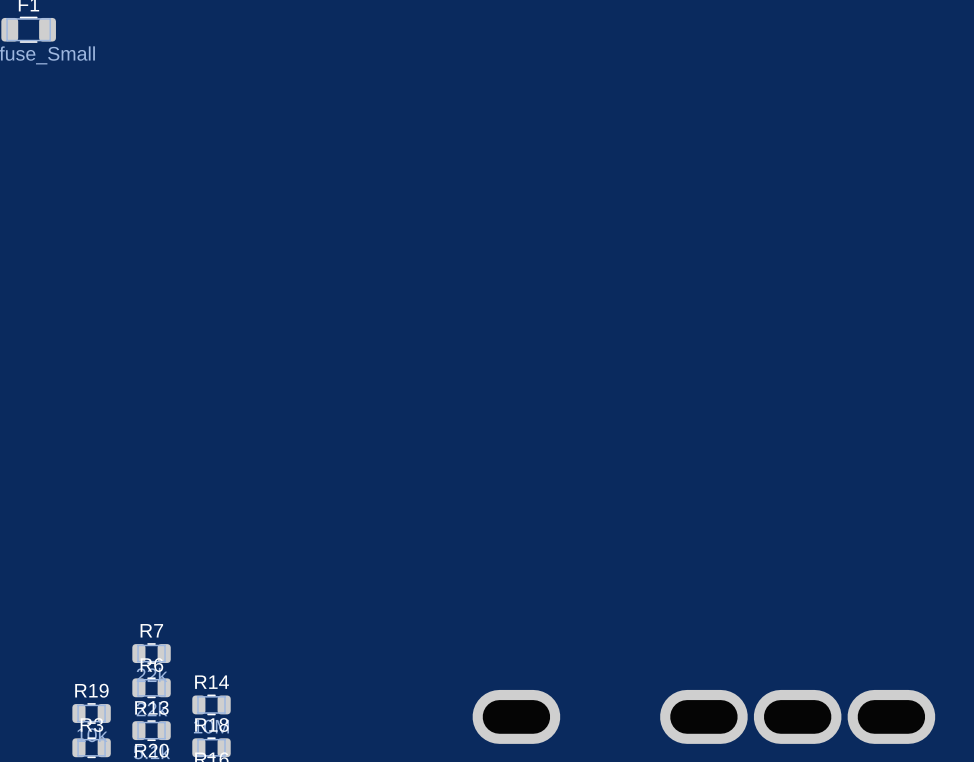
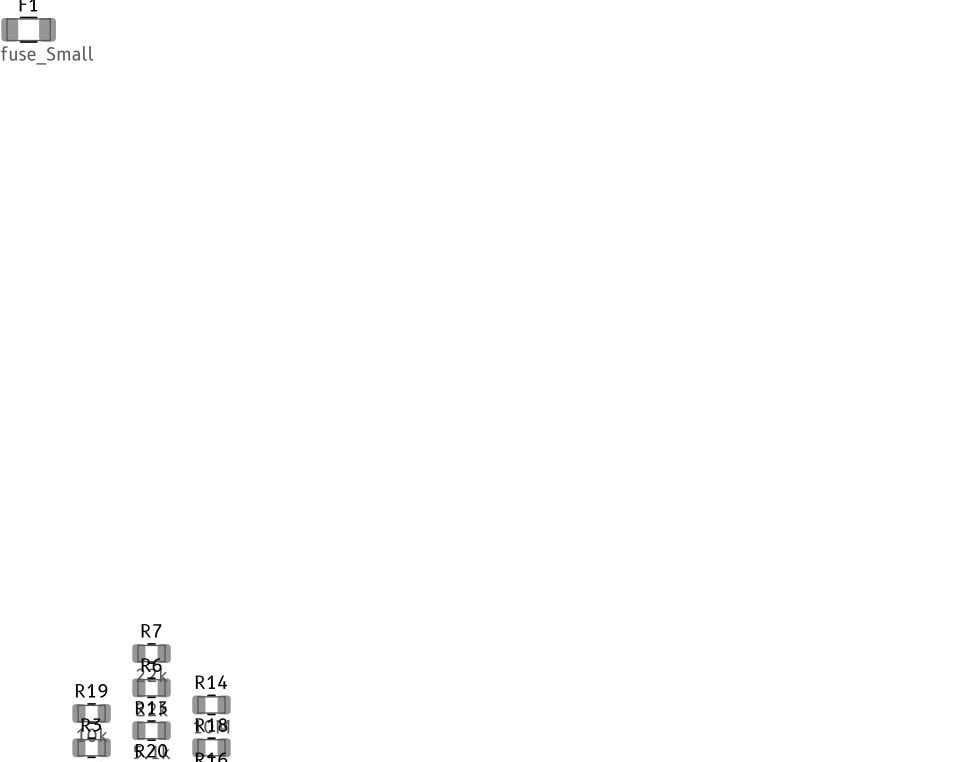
part: (516, 716) -> none
part: (703, 716) -> none
part: (797, 716) -> none
part: (891, 716) -> none

